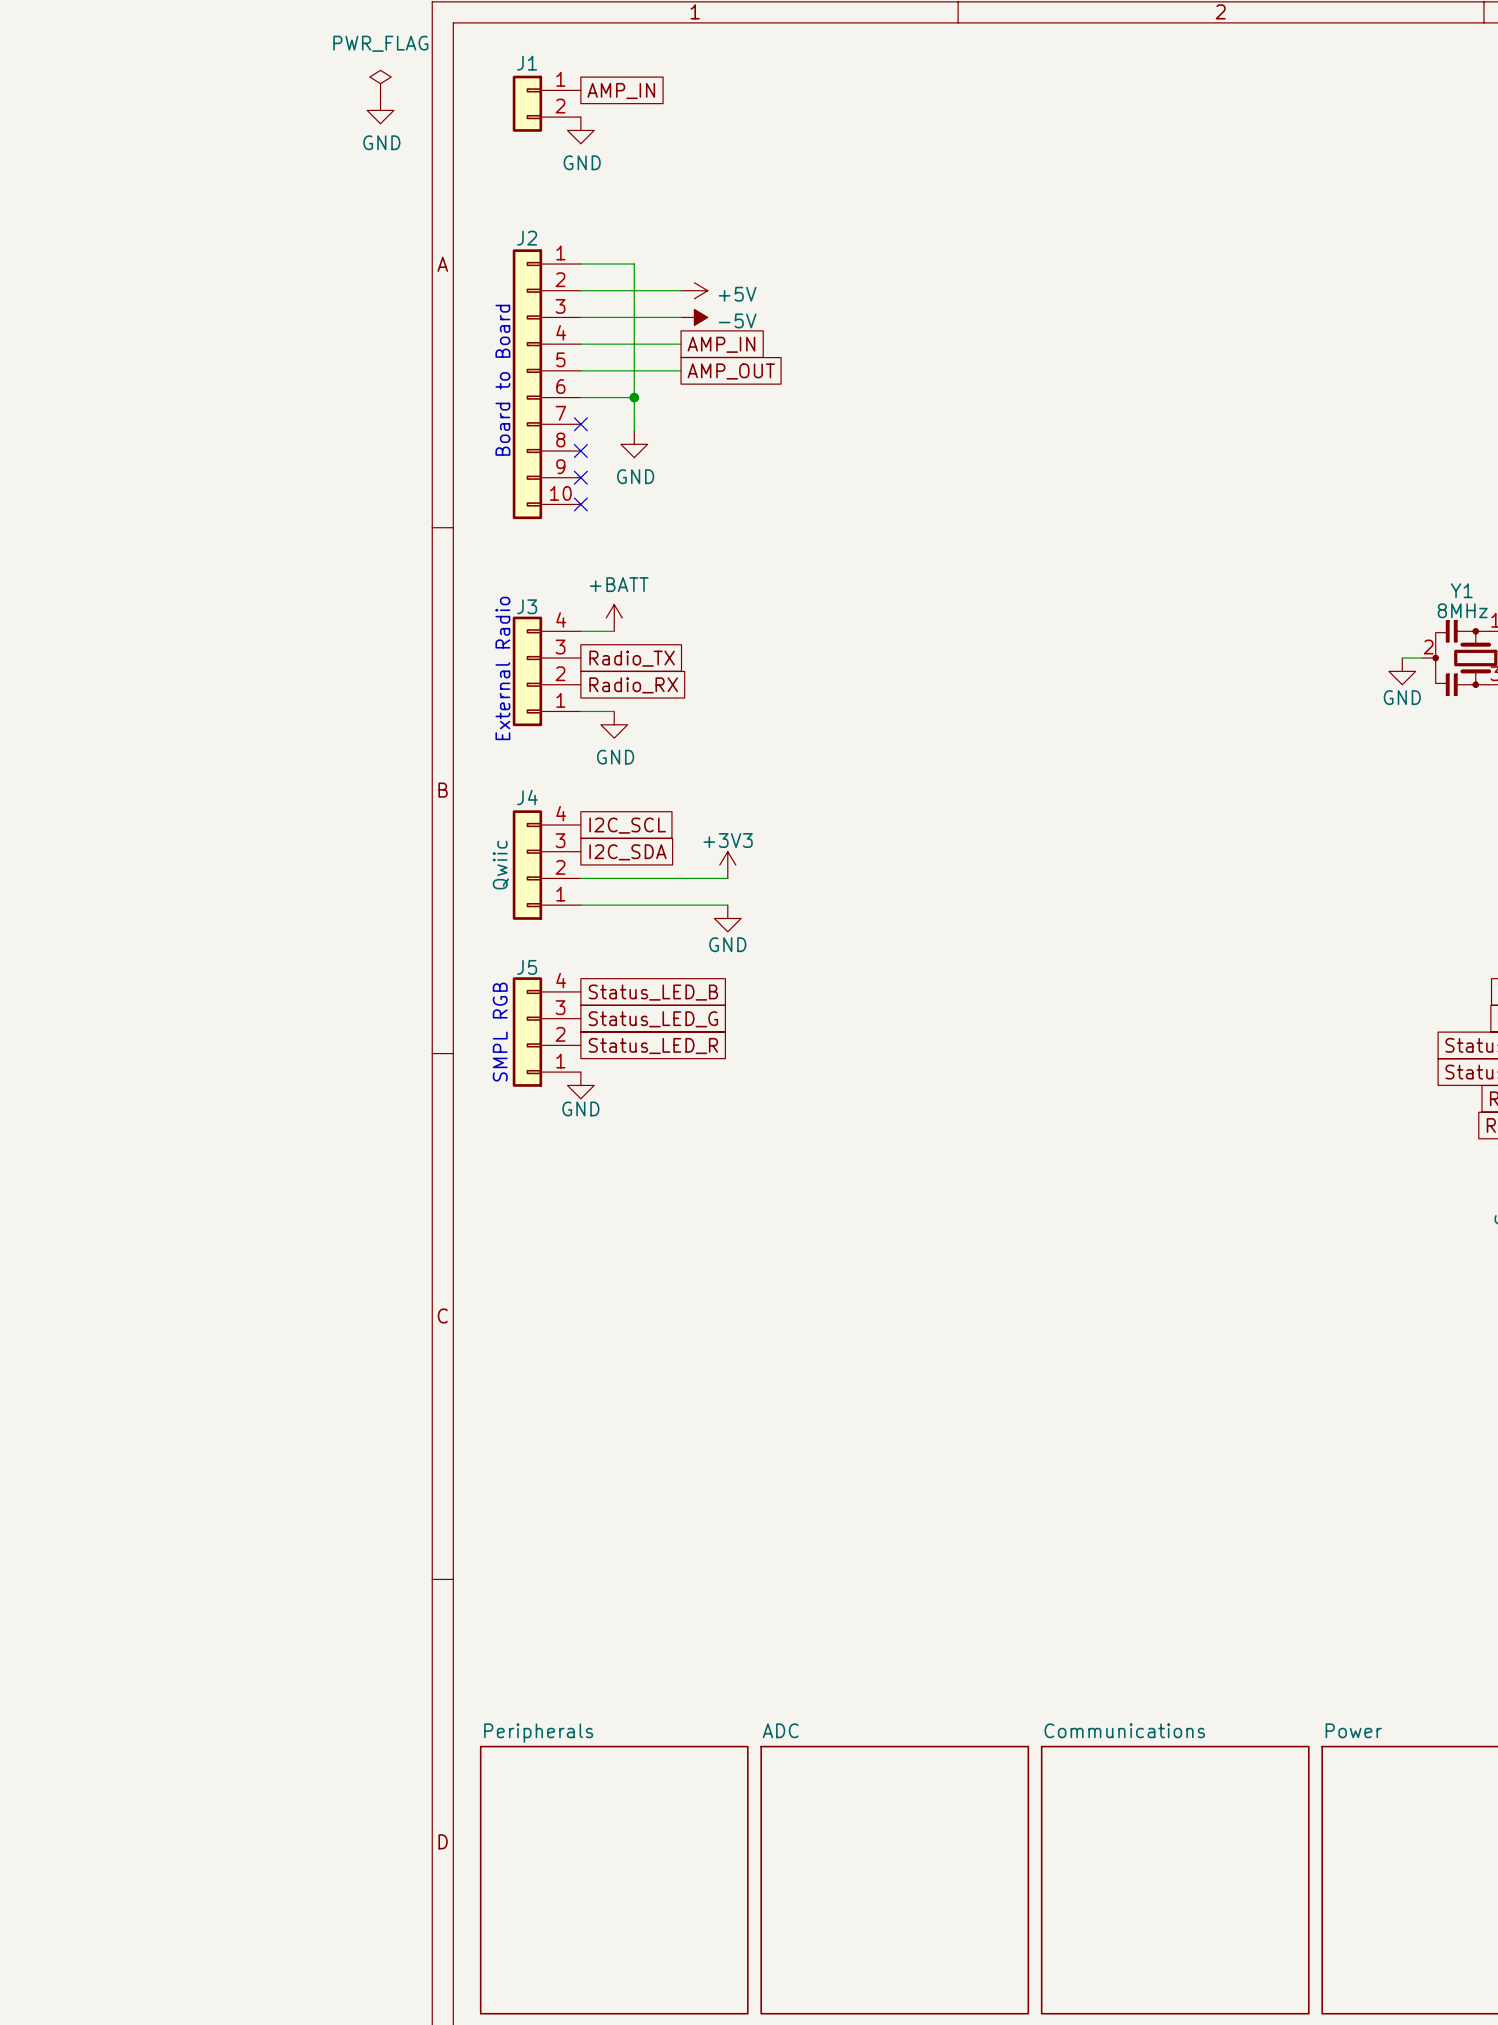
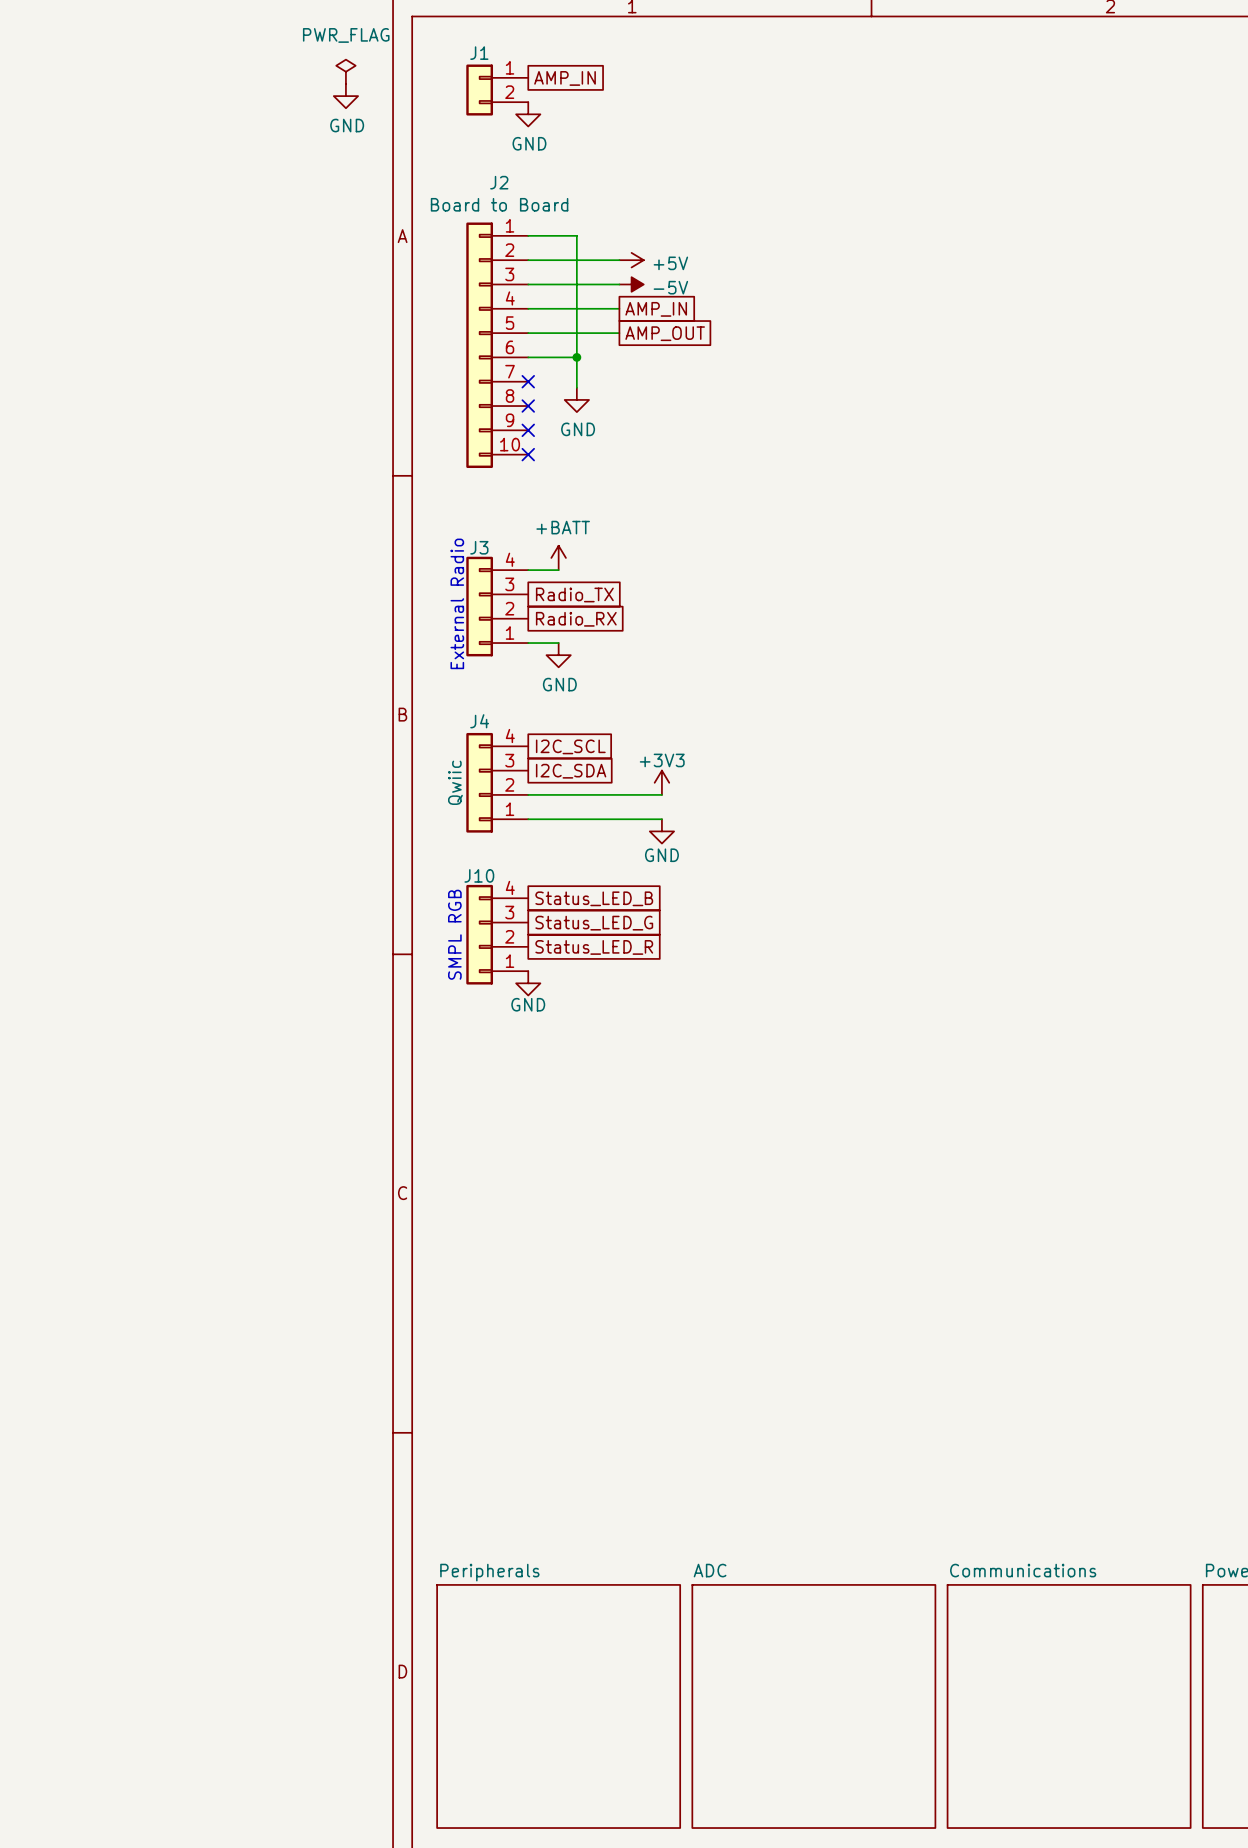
J2 value: none -> Board to Board (499, 204)
J2 name position: J2 (527, 238) -> J2 (499, 182)
text: Board to Board (502, 380) -> none
J5 name: J5 (527, 967) -> J10 (479, 875)

